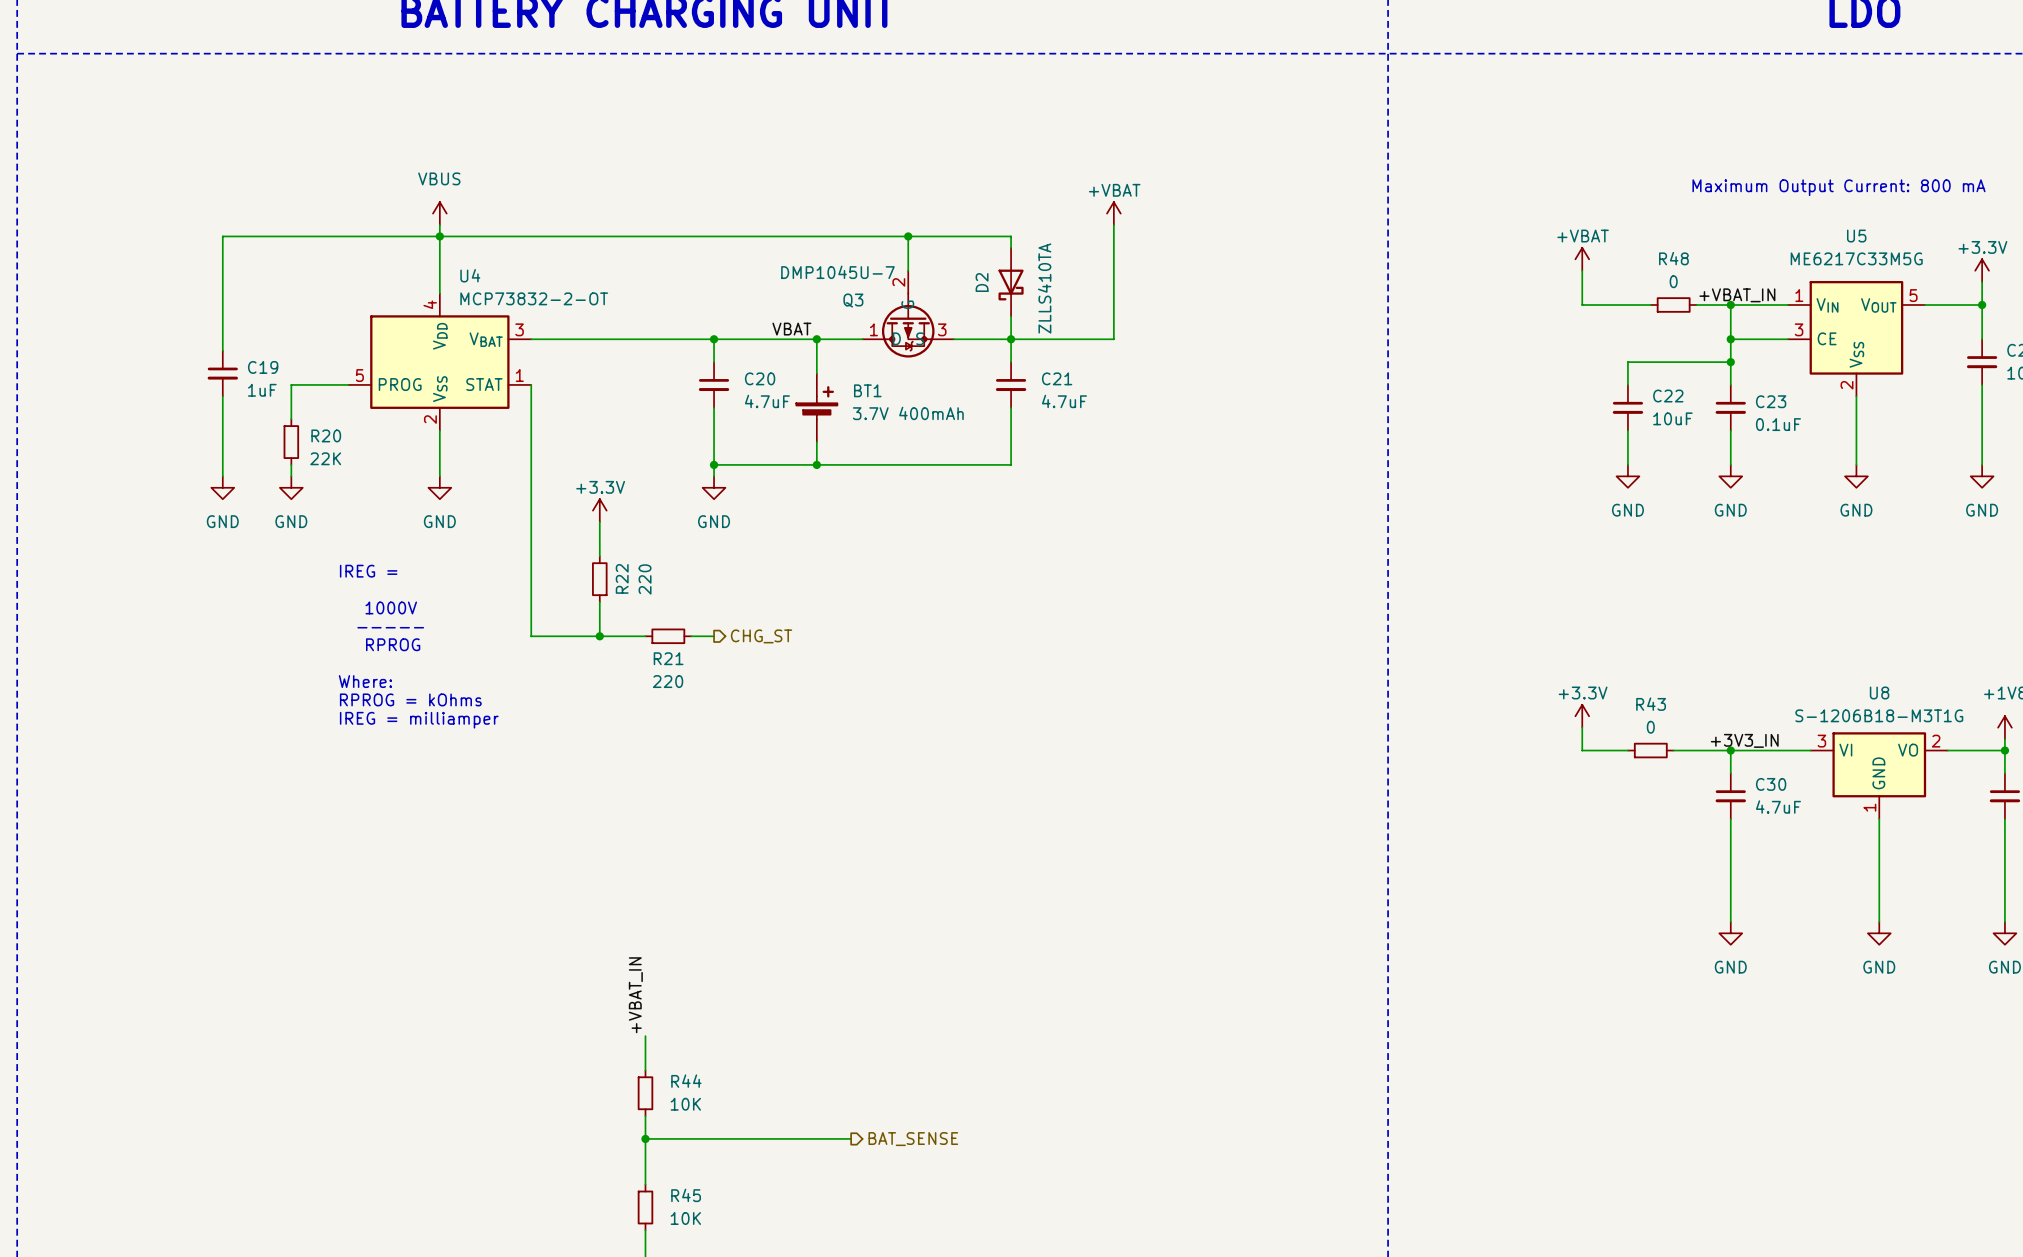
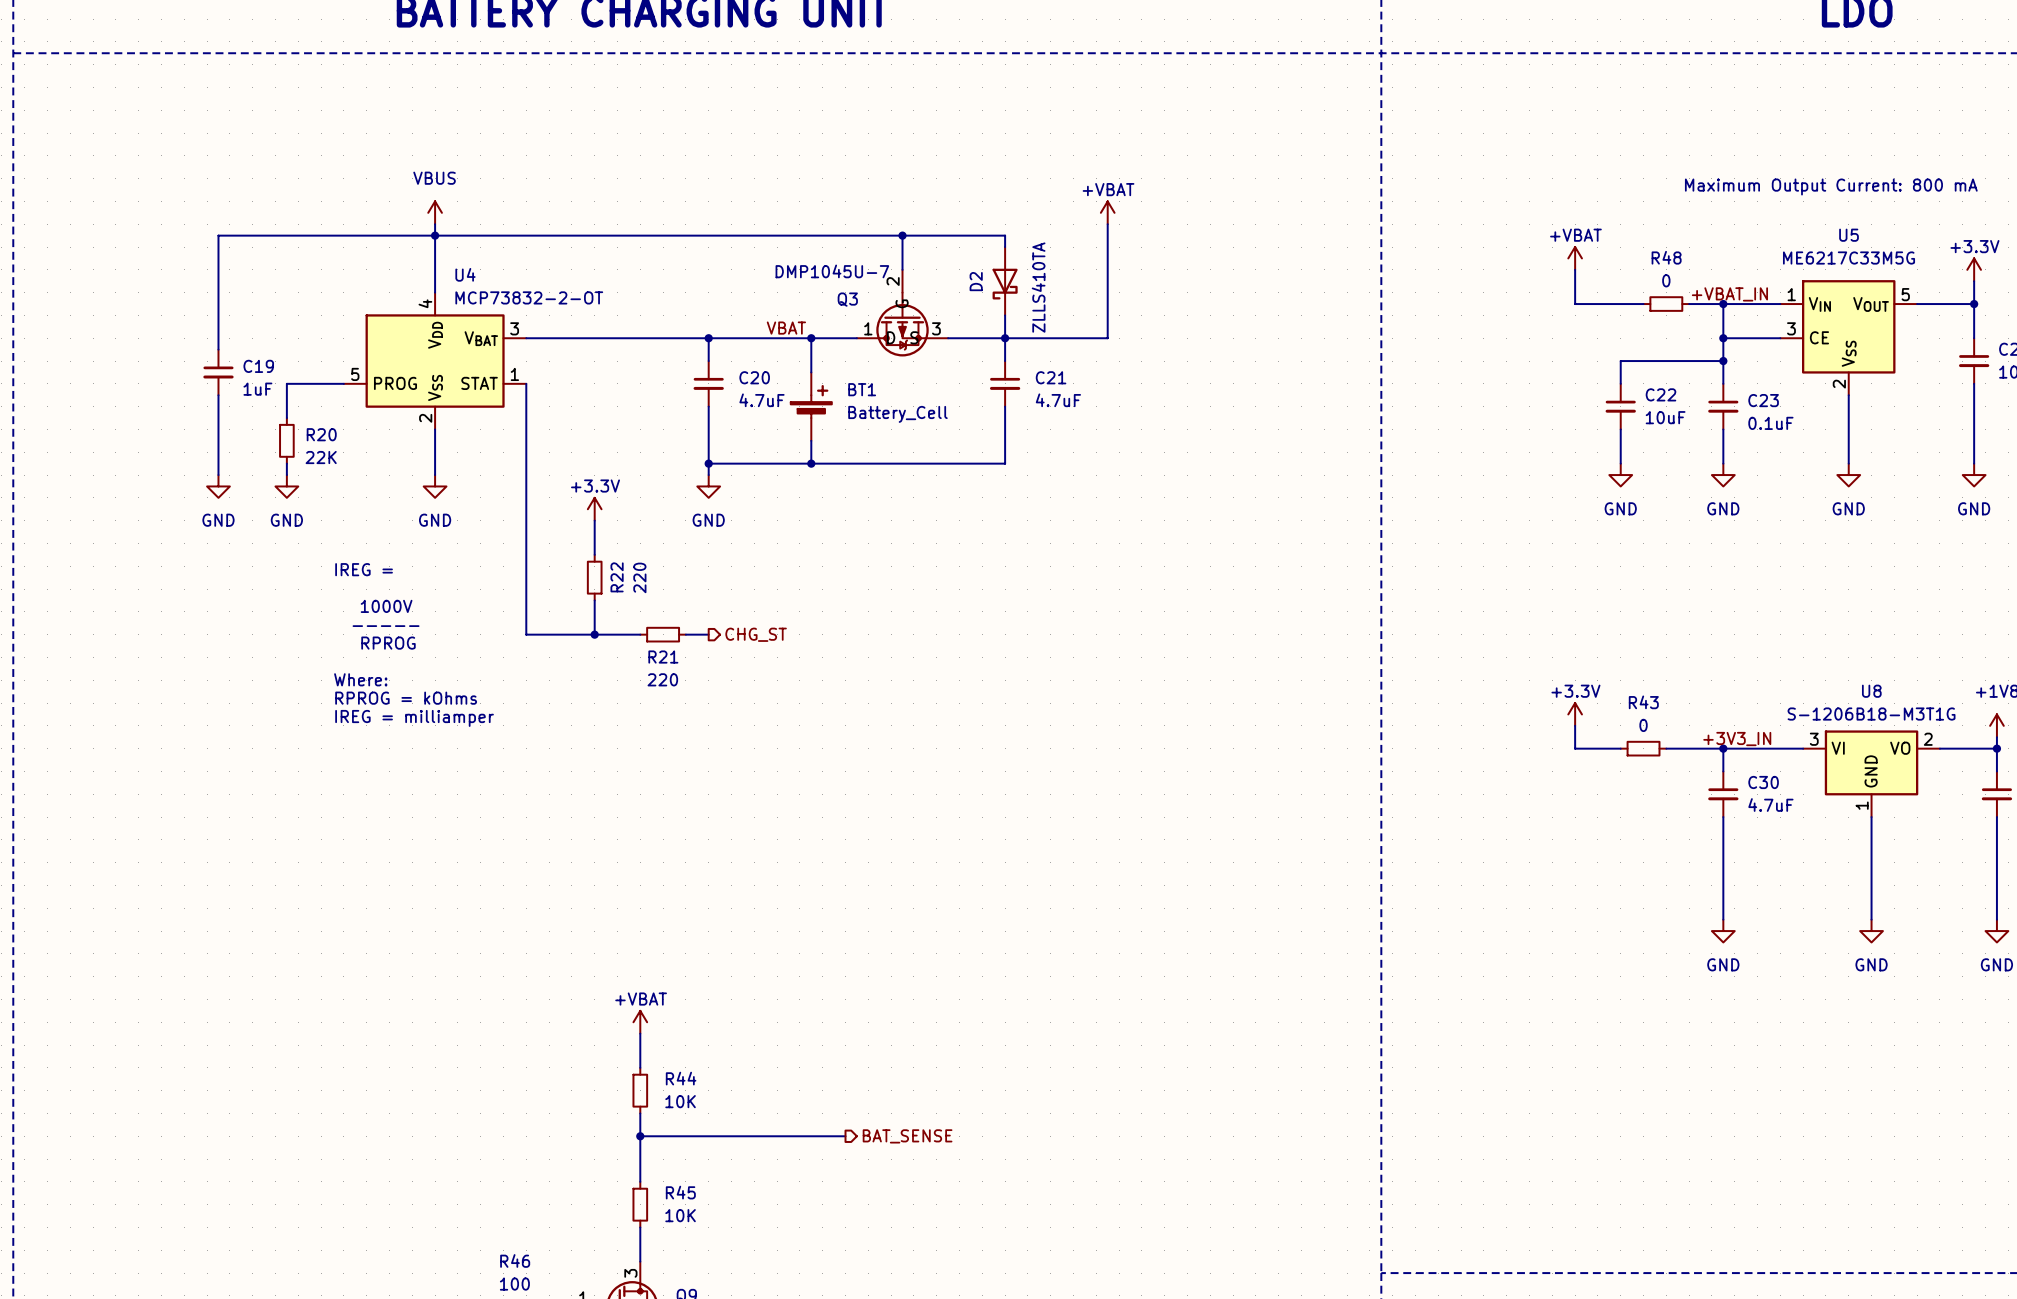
BT1 value: 3.7V 400mAh (908, 413) -> Battery_Cell (897, 414)
label: +VBAT_IN (635, 995) -> none
power symbol: none -> +VBAT (640, 1022)

